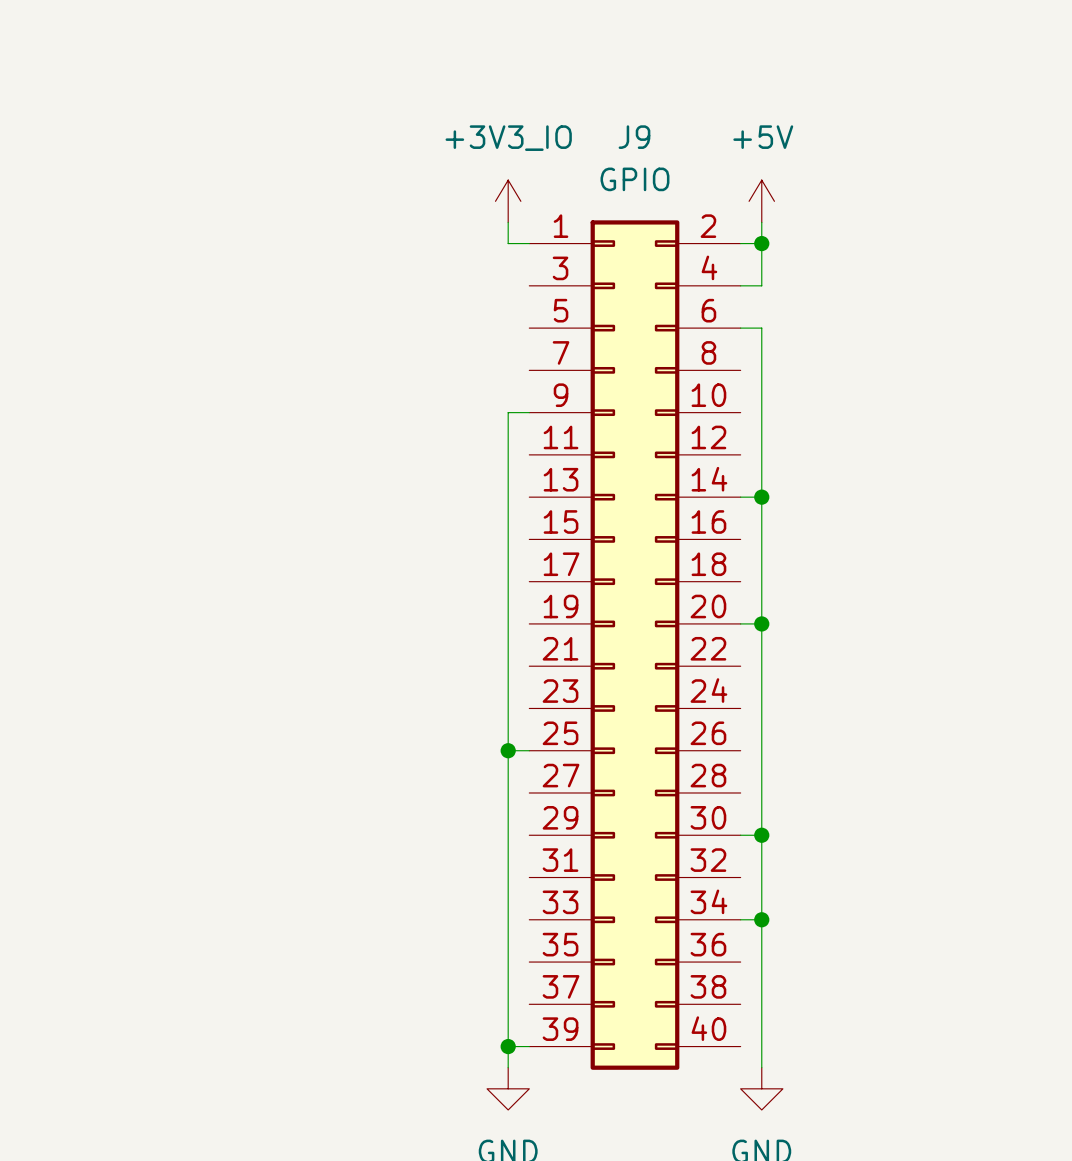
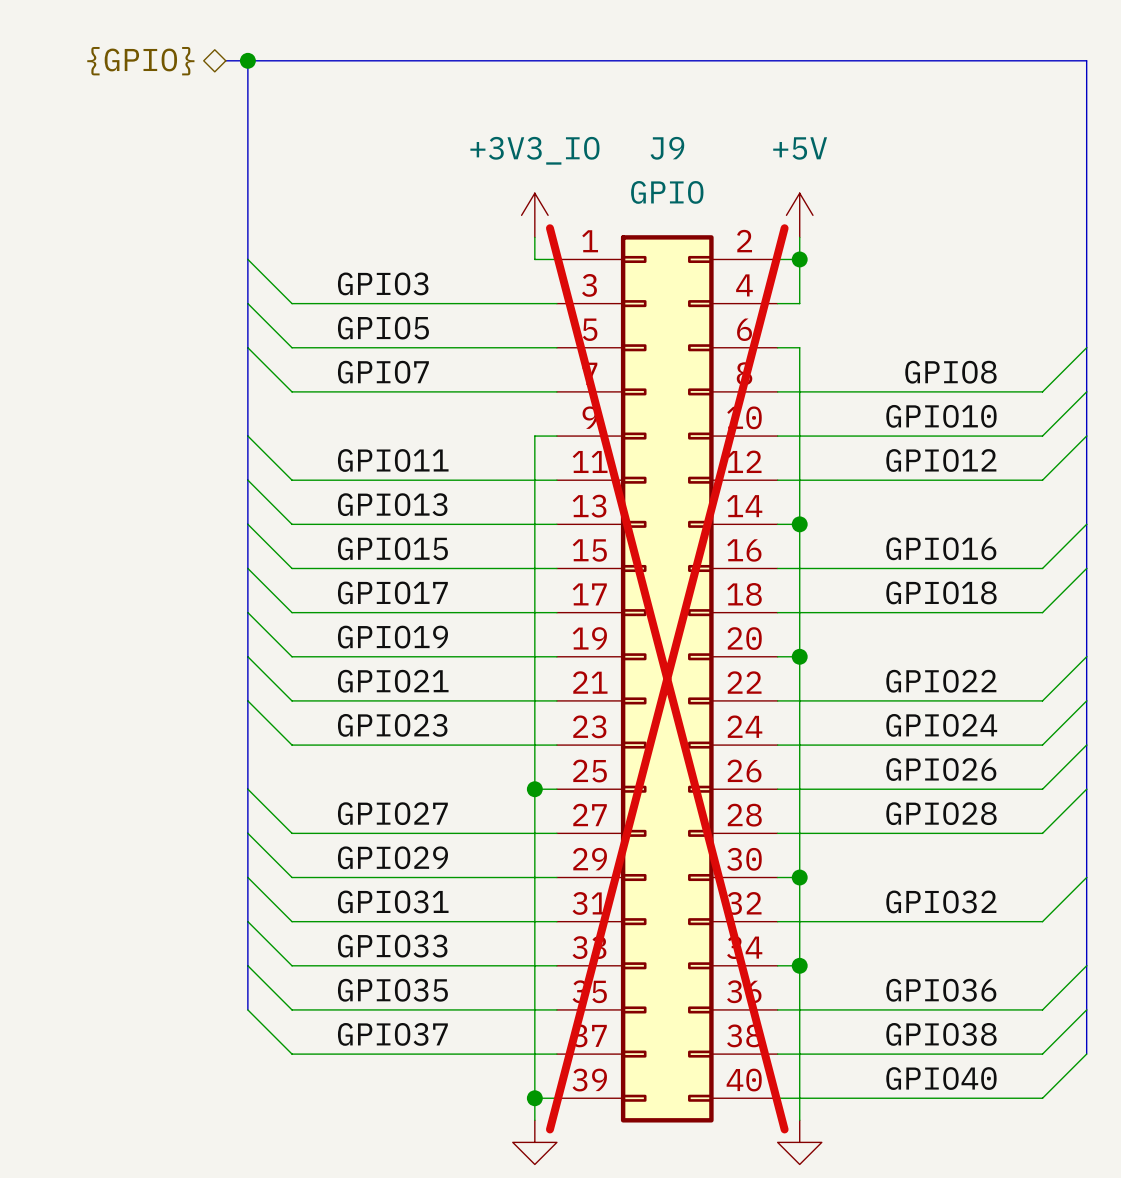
bus: none -> (225, 60) (1086, 60) (1086, 1054)
bus: none -> (247, 60) (247, 1009)
junction: none -> (247, 60)
hierarchical label: none -> {GPIO} (140, 61)
wire: none -> (247, 259) (292, 303) (556, 303)
label: none -> GPIO3 (383, 283)
wire: none -> (247, 303) (292, 347) (556, 347)
label: none -> GPIO5 (383, 328)
wire: none -> (247, 347) (292, 391) (556, 391)
wire: none -> (1086, 347) (1042, 391) (777, 391)
label: none -> GPIO7 (383, 372)
label: none -> GPIO8 (950, 372)
wire: none -> (1086, 391) (1042, 436) (777, 436)
label: none -> GPIO10 (941, 416)
wire: none -> (247, 436) (292, 480) (556, 480)
wire: none -> (1086, 436) (1042, 480) (777, 480)
label: none -> GPIO11 (393, 460)
label: none -> GPIO12 (941, 460)
wire: none -> (247, 480) (292, 524) (556, 524)
label: none -> GPIO13 (392, 504)
wire: none -> (247, 524) (292, 568) (556, 568)
wire: none -> (1086, 524) (1042, 568) (777, 568)
label: none -> GPIO15 (392, 548)
label: none -> GPIO16 (941, 548)
wire: none -> (247, 568) (292, 612) (556, 612)
wire: none -> (1086, 568) (1042, 612) (777, 612)
label: none -> GPIO17 (392, 592)
label: none -> GPIO18 (941, 592)
wire: none -> (247, 612) (292, 656) (556, 656)
label: none -> GPIO19 (392, 637)
wire: none -> (247, 656) (292, 700) (556, 700)
wire: none -> (1086, 656) (1042, 700) (777, 700)
J9 do-not-place cross: none -> (667, 678)
label: none -> GPIO21 (393, 681)
label: none -> GPIO22 (941, 681)
wire: none -> (247, 700) (292, 745) (556, 745)
wire: none -> (1086, 700) (1042, 745) (777, 745)
label: none -> GPIO23 (392, 725)
label: none -> GPIO24 (941, 725)
wire: none -> (1086, 745) (1042, 789) (777, 789)
label: none -> GPIO26 (941, 769)
wire: none -> (247, 789) (292, 833) (556, 833)
wire: none -> (1086, 789) (1042, 833) (777, 833)
label: none -> GPIO27 (392, 813)
label: none -> GPIO28 (941, 813)
wire: none -> (247, 833) (292, 877) (556, 877)
label: none -> GPIO29 (392, 857)
wire: none -> (247, 877) (292, 921) (556, 921)
wire: none -> (1086, 877) (1042, 921) (777, 921)
label: none -> GPIO31 (393, 901)
label: none -> GPIO32 (941, 901)
wire: none -> (247, 921) (292, 965) (556, 965)
label: none -> GPIO33 (392, 946)
wire: none -> (247, 965) (292, 1009) (556, 1009)
wire: none -> (1086, 965) (1042, 1009) (777, 1009)
label: none -> GPIO35 (392, 990)
label: none -> GPIO36 (941, 990)
wire: none -> (247, 1009) (292, 1054) (556, 1054)
wire: none -> (1086, 1009) (1042, 1054) (777, 1054)
label: none -> GPIO37 (392, 1034)
label: none -> GPIO38 (941, 1034)
wire: none -> (1086, 1054) (1042, 1098) (777, 1098)
label: none -> GPIO40 (941, 1078)

